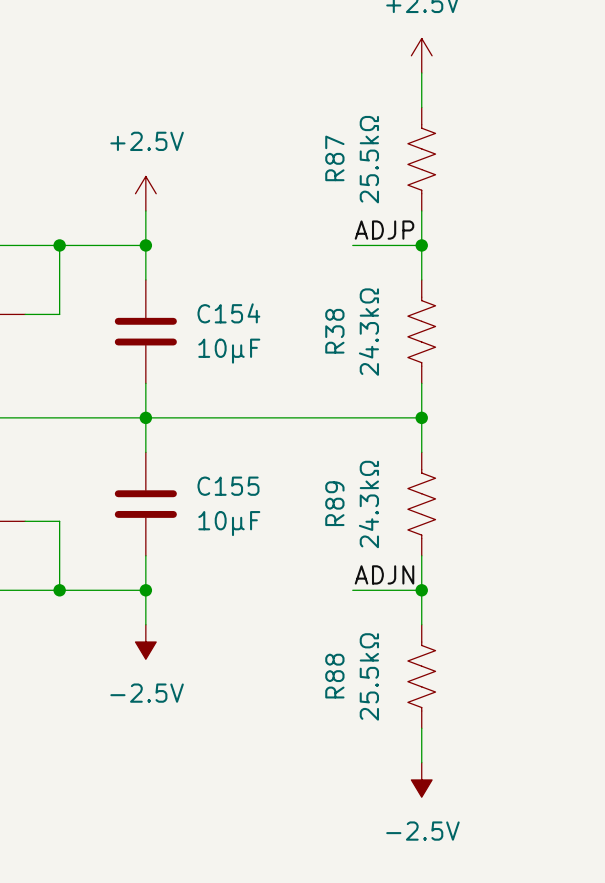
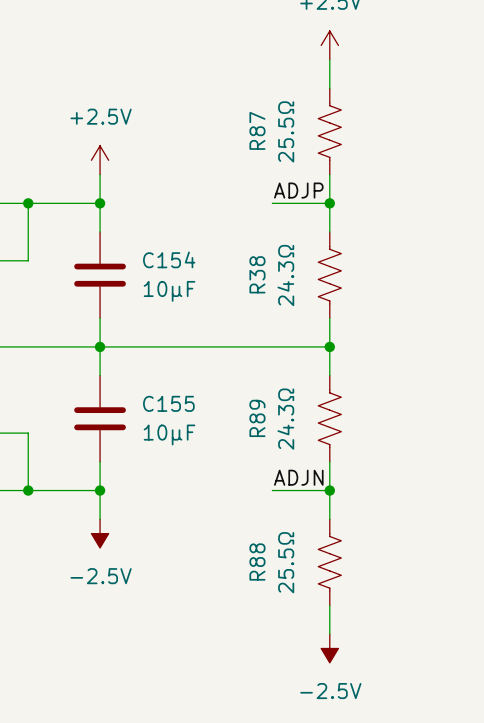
R87 value: 25.5kΩ (369, 159) -> 25.5Ω (286, 131)
R38 value: 24.3kΩ (368, 332) -> 24.3Ω (285, 275)
R89 value: 24.3kΩ (368, 504) -> 24.3Ω (285, 419)
R88 value: 25.5kΩ (369, 676) -> 25.5Ω (286, 562)

